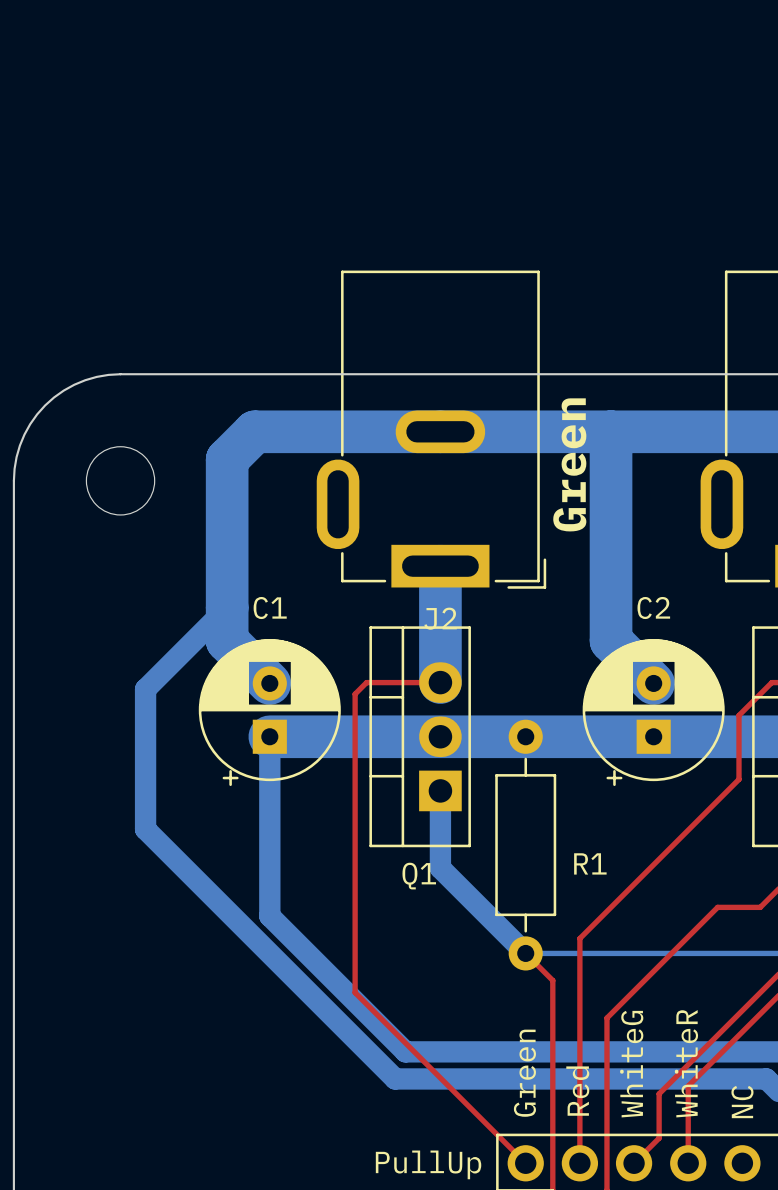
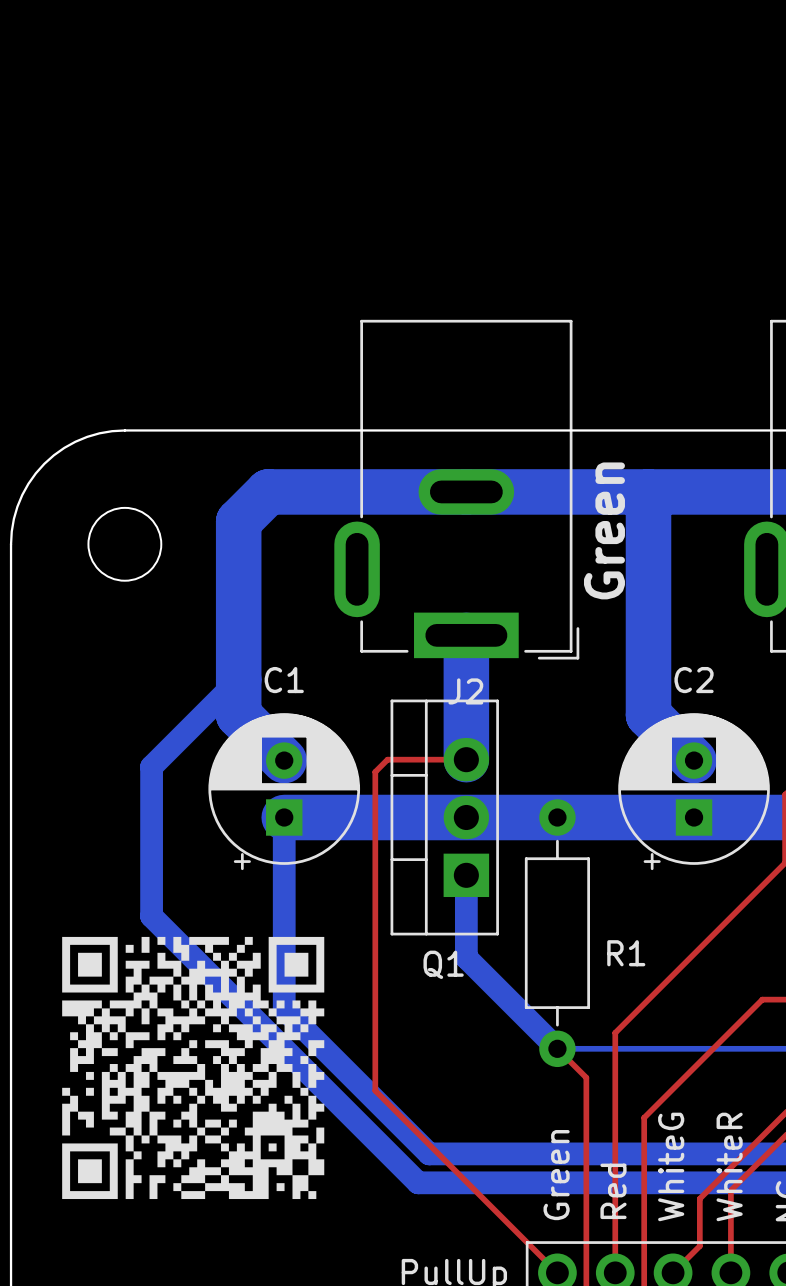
drawing: none -> [62, 936, 325, 1200]

